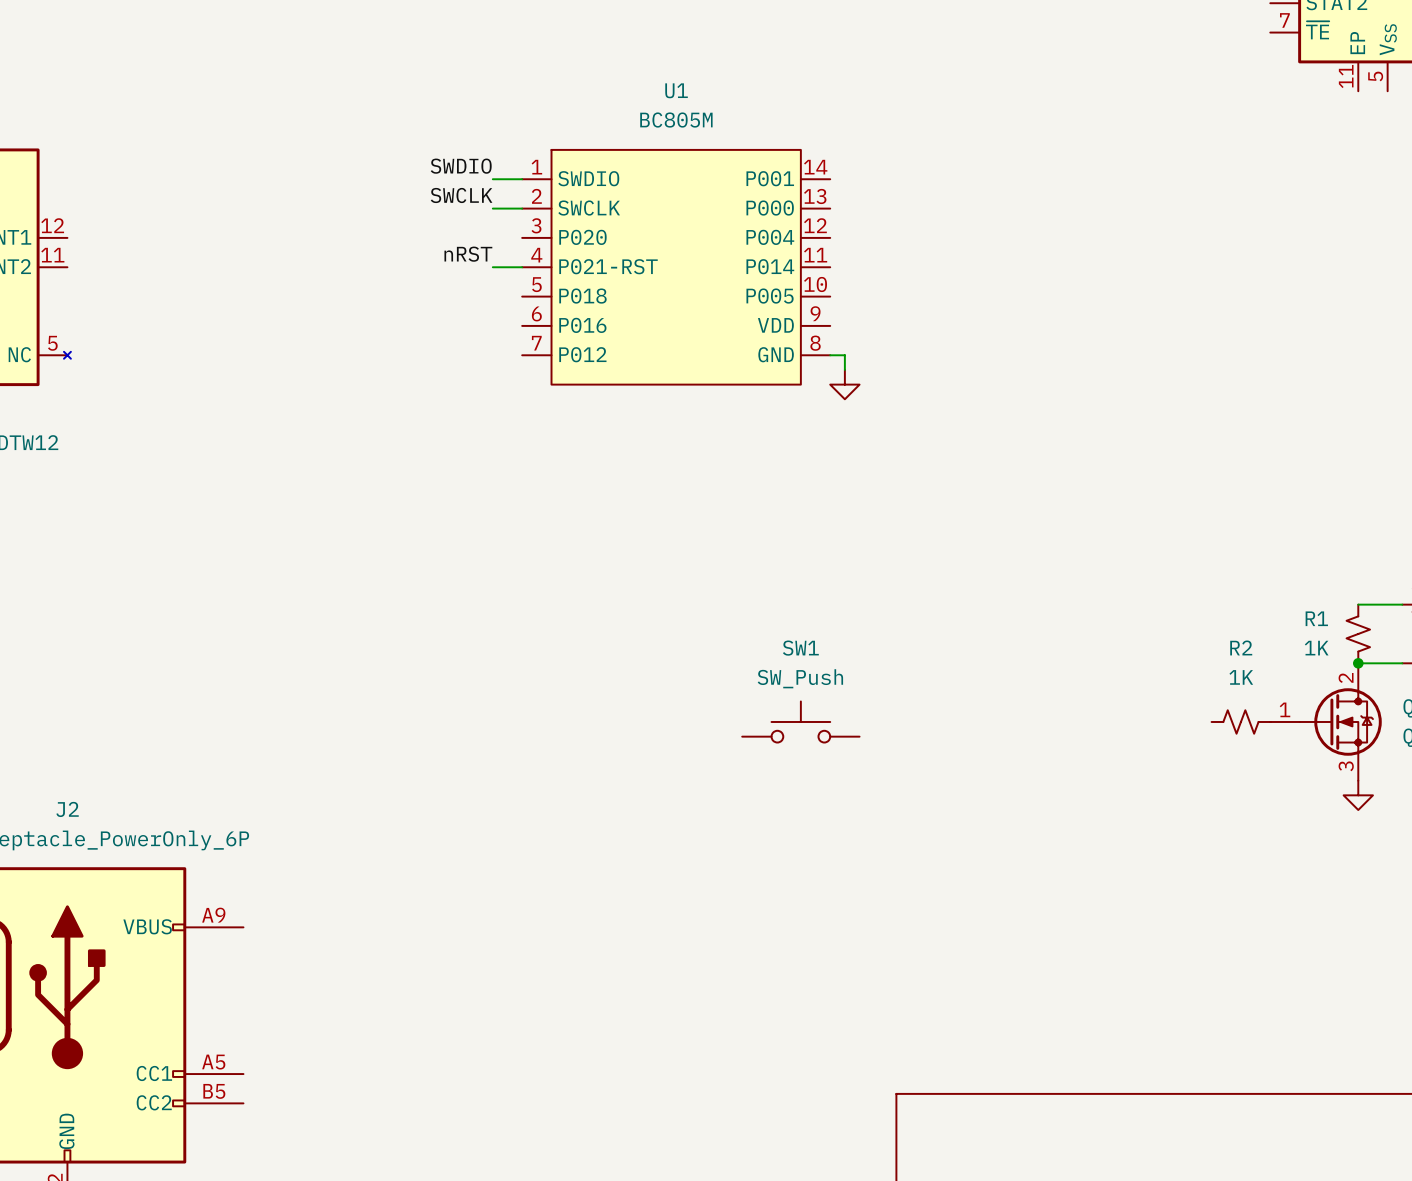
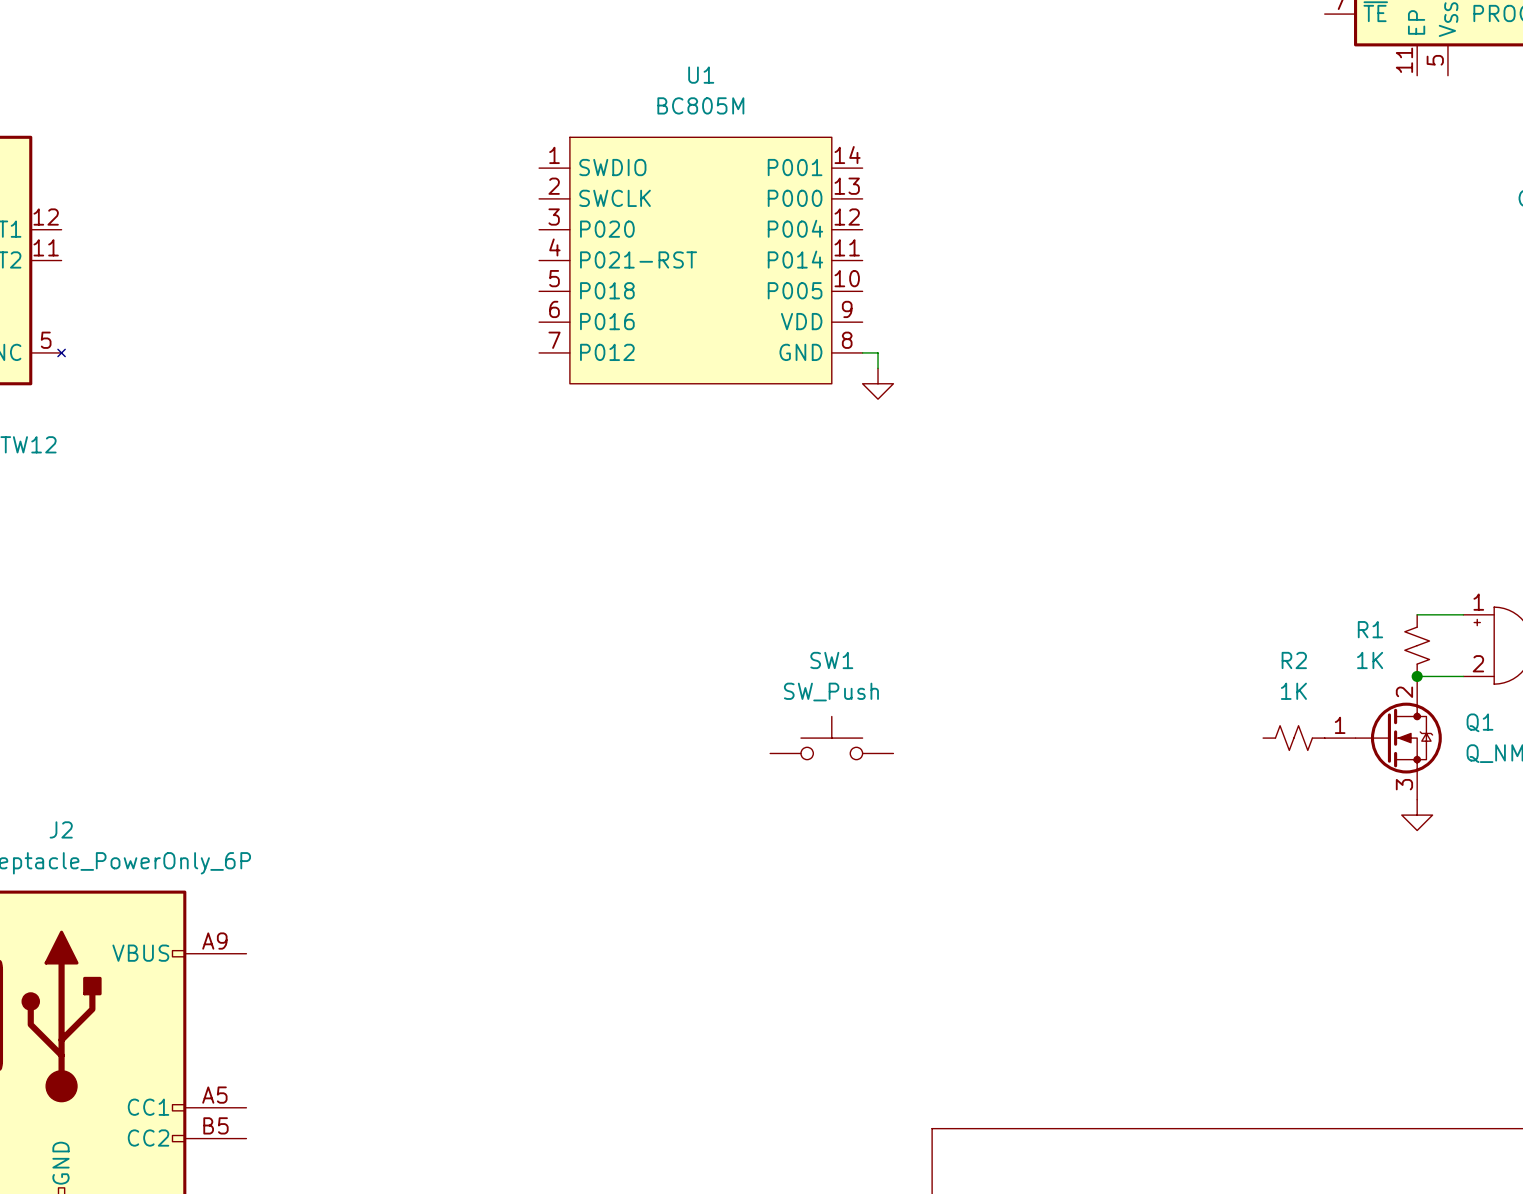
label: SWDIO (461, 166) -> none
wire: (492, 179) (522, 179) -> none
label: SWCLK (461, 195) -> none
wire: (492, 208) (522, 208) -> none
label: nRST (468, 254) -> none
wire: (492, 267) (522, 267) -> none

